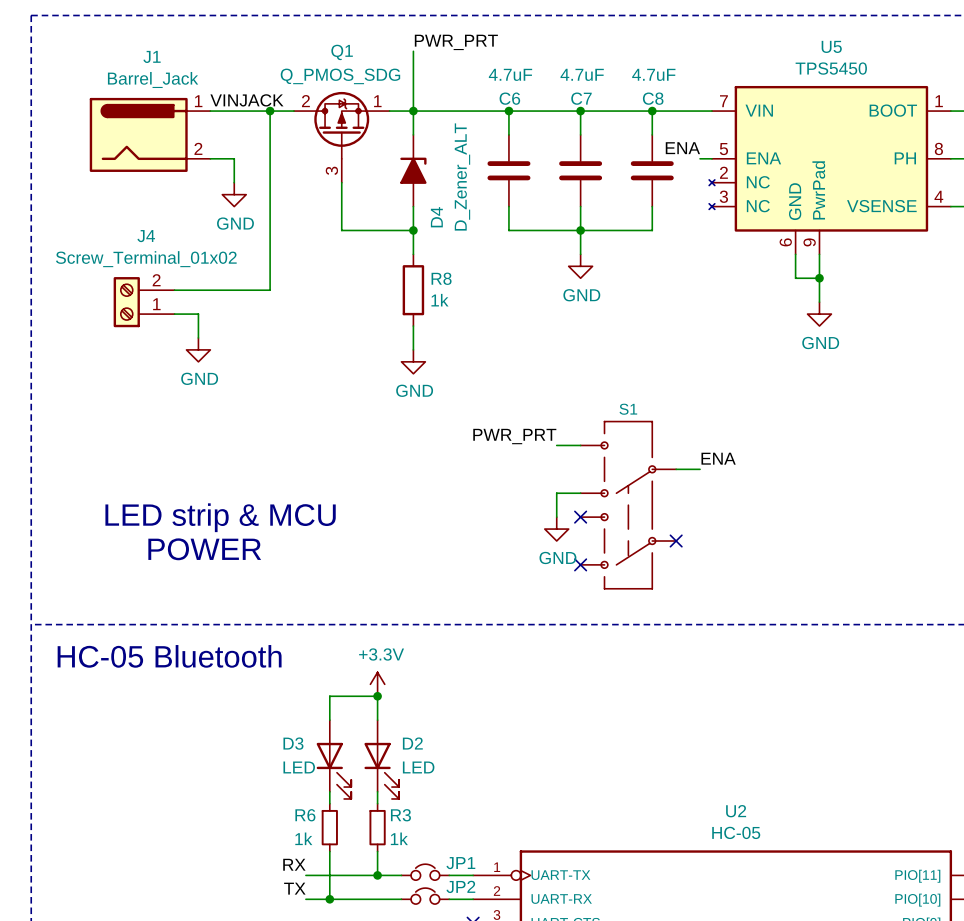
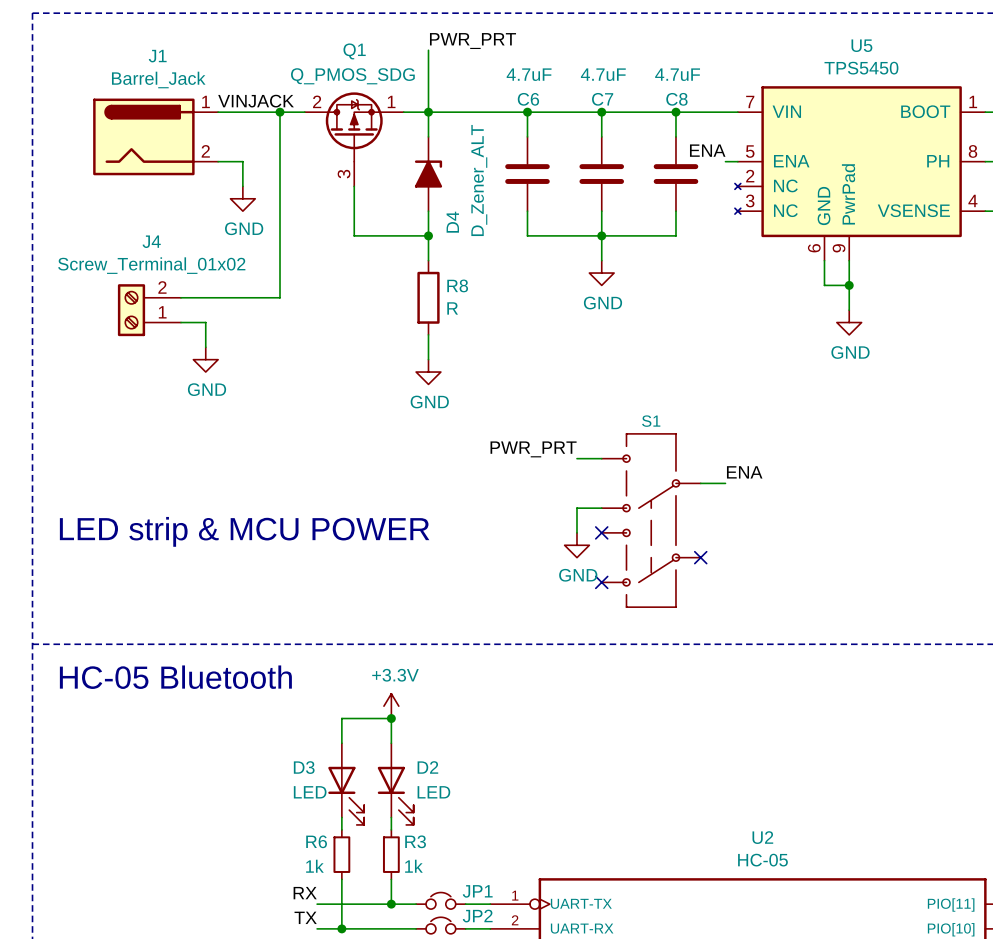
R8 value: 1k (439, 300) -> R (452, 308)
text: LED strip & MCU (220, 517) -> LED strip & MCU POWER (244, 531)
text: POWER (204, 549) -> none

